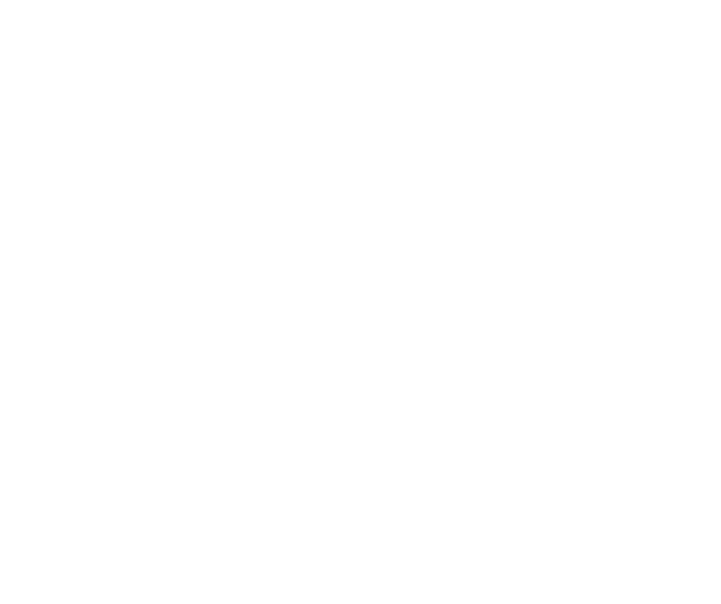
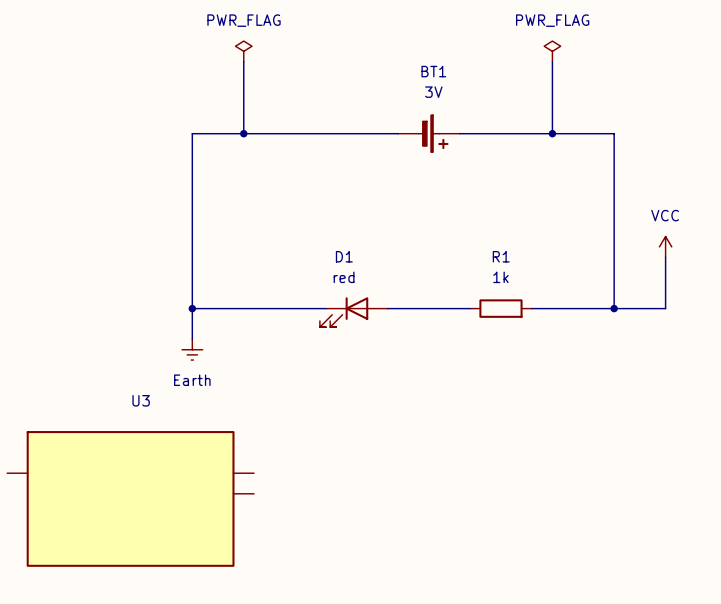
power symbol: none -> PWR_FLAG (243, 51)
power symbol: none -> PWR_FLAG (552, 51)
wire: none -> (243, 61) (243, 133)
wire: none -> (552, 61) (552, 133)
junction: none -> (243, 133)
wire: none -> (398, 133) (192, 133) (192, 339)
BT1: none -> 3V (428, 133)
wire: none -> (459, 133) (614, 133) (614, 308)
junction: none -> (552, 133)
power symbol: none -> VCC (665, 246)
wire: none -> (665, 257) (665, 308) (531, 308)
wire: none -> (192, 308) (326, 308)
junction: none -> (192, 308)
wire: none -> (387, 308) (470, 308)
R1: none -> 1k (500, 308)
junction: none -> (614, 308)
D1: none -> red (353, 312)
power symbol: none -> Earth (192, 349)
U3: none -> (130, 498)

